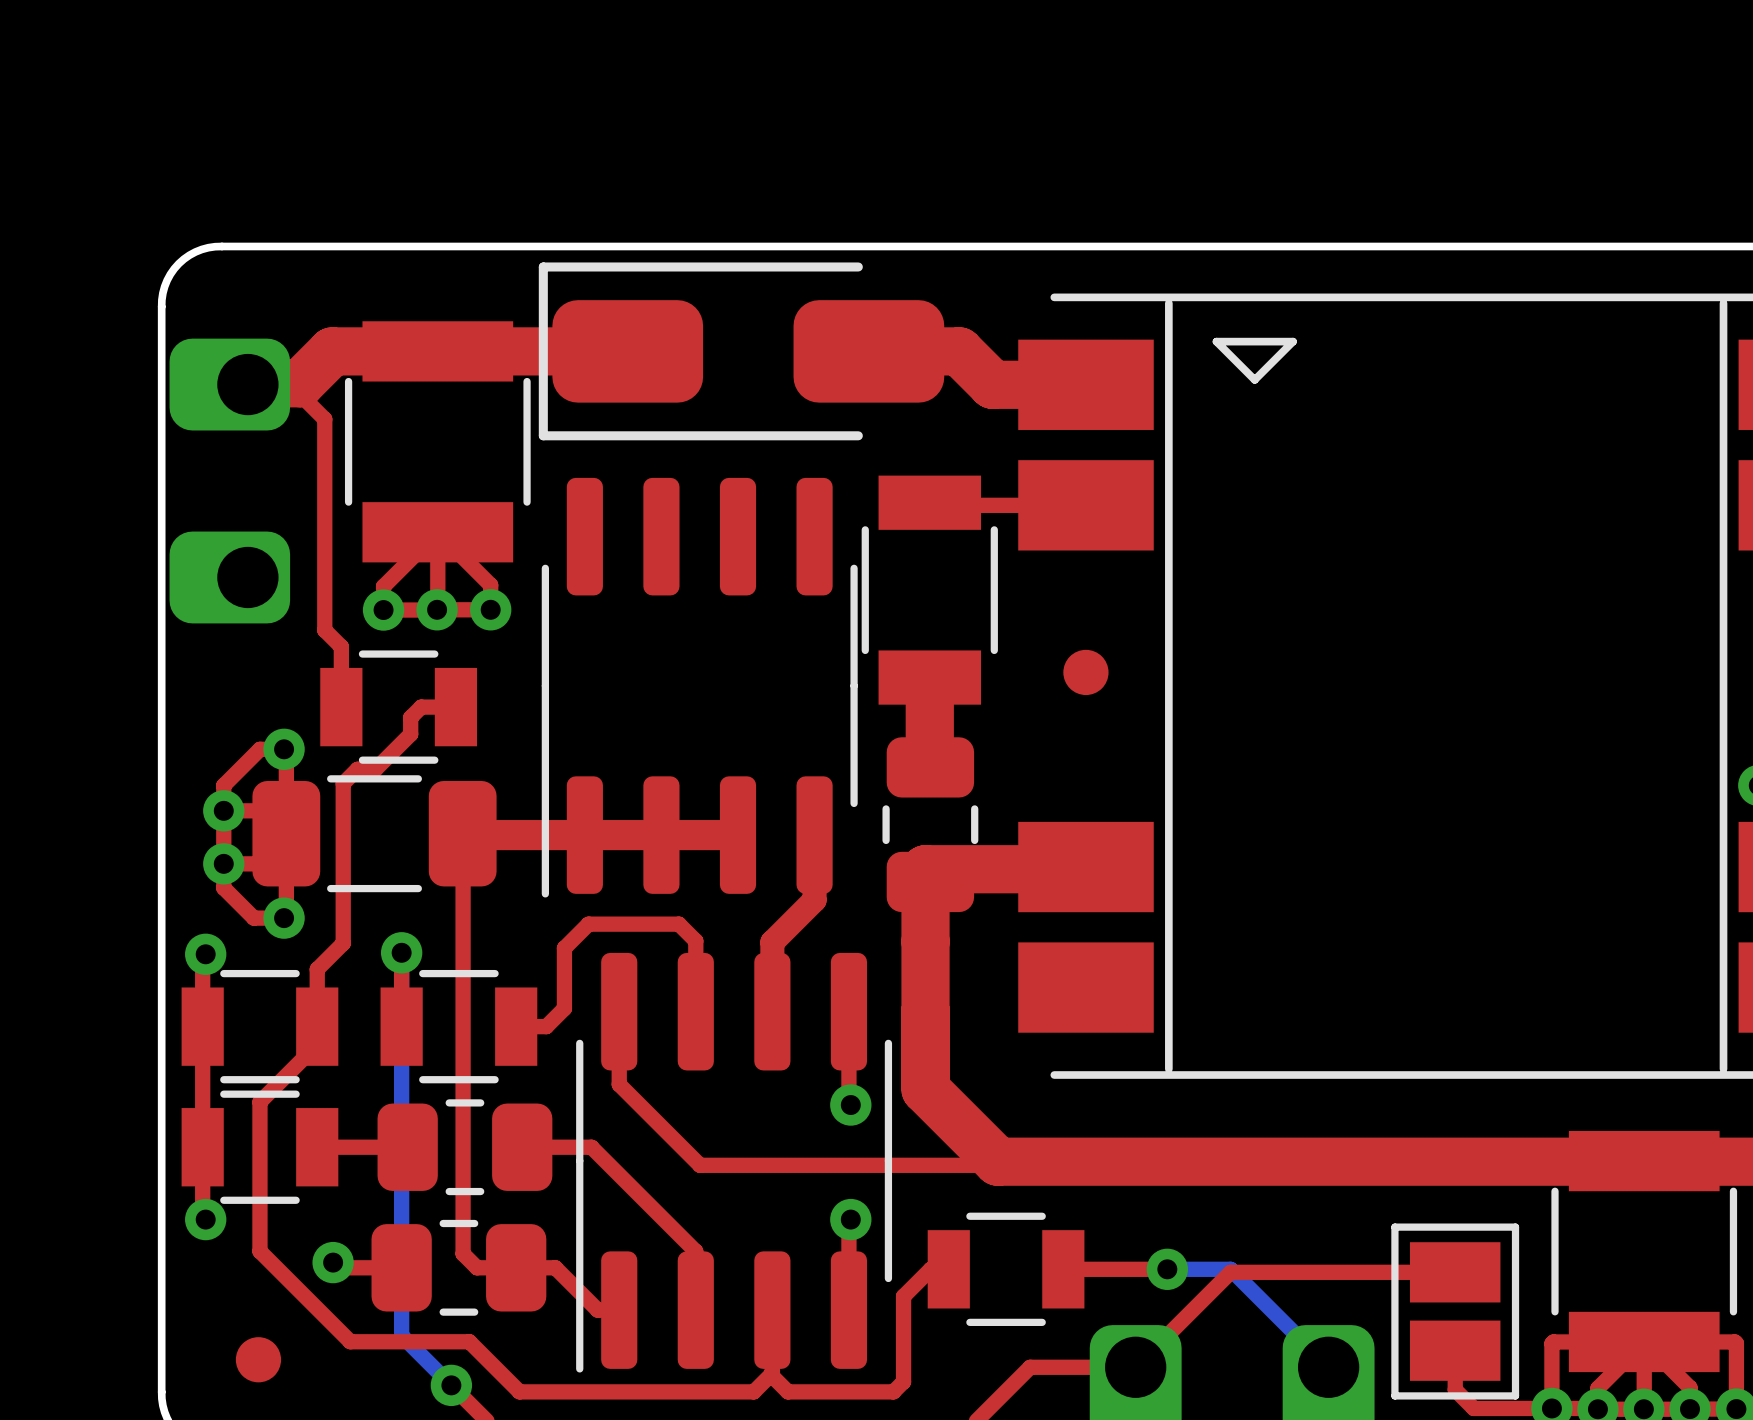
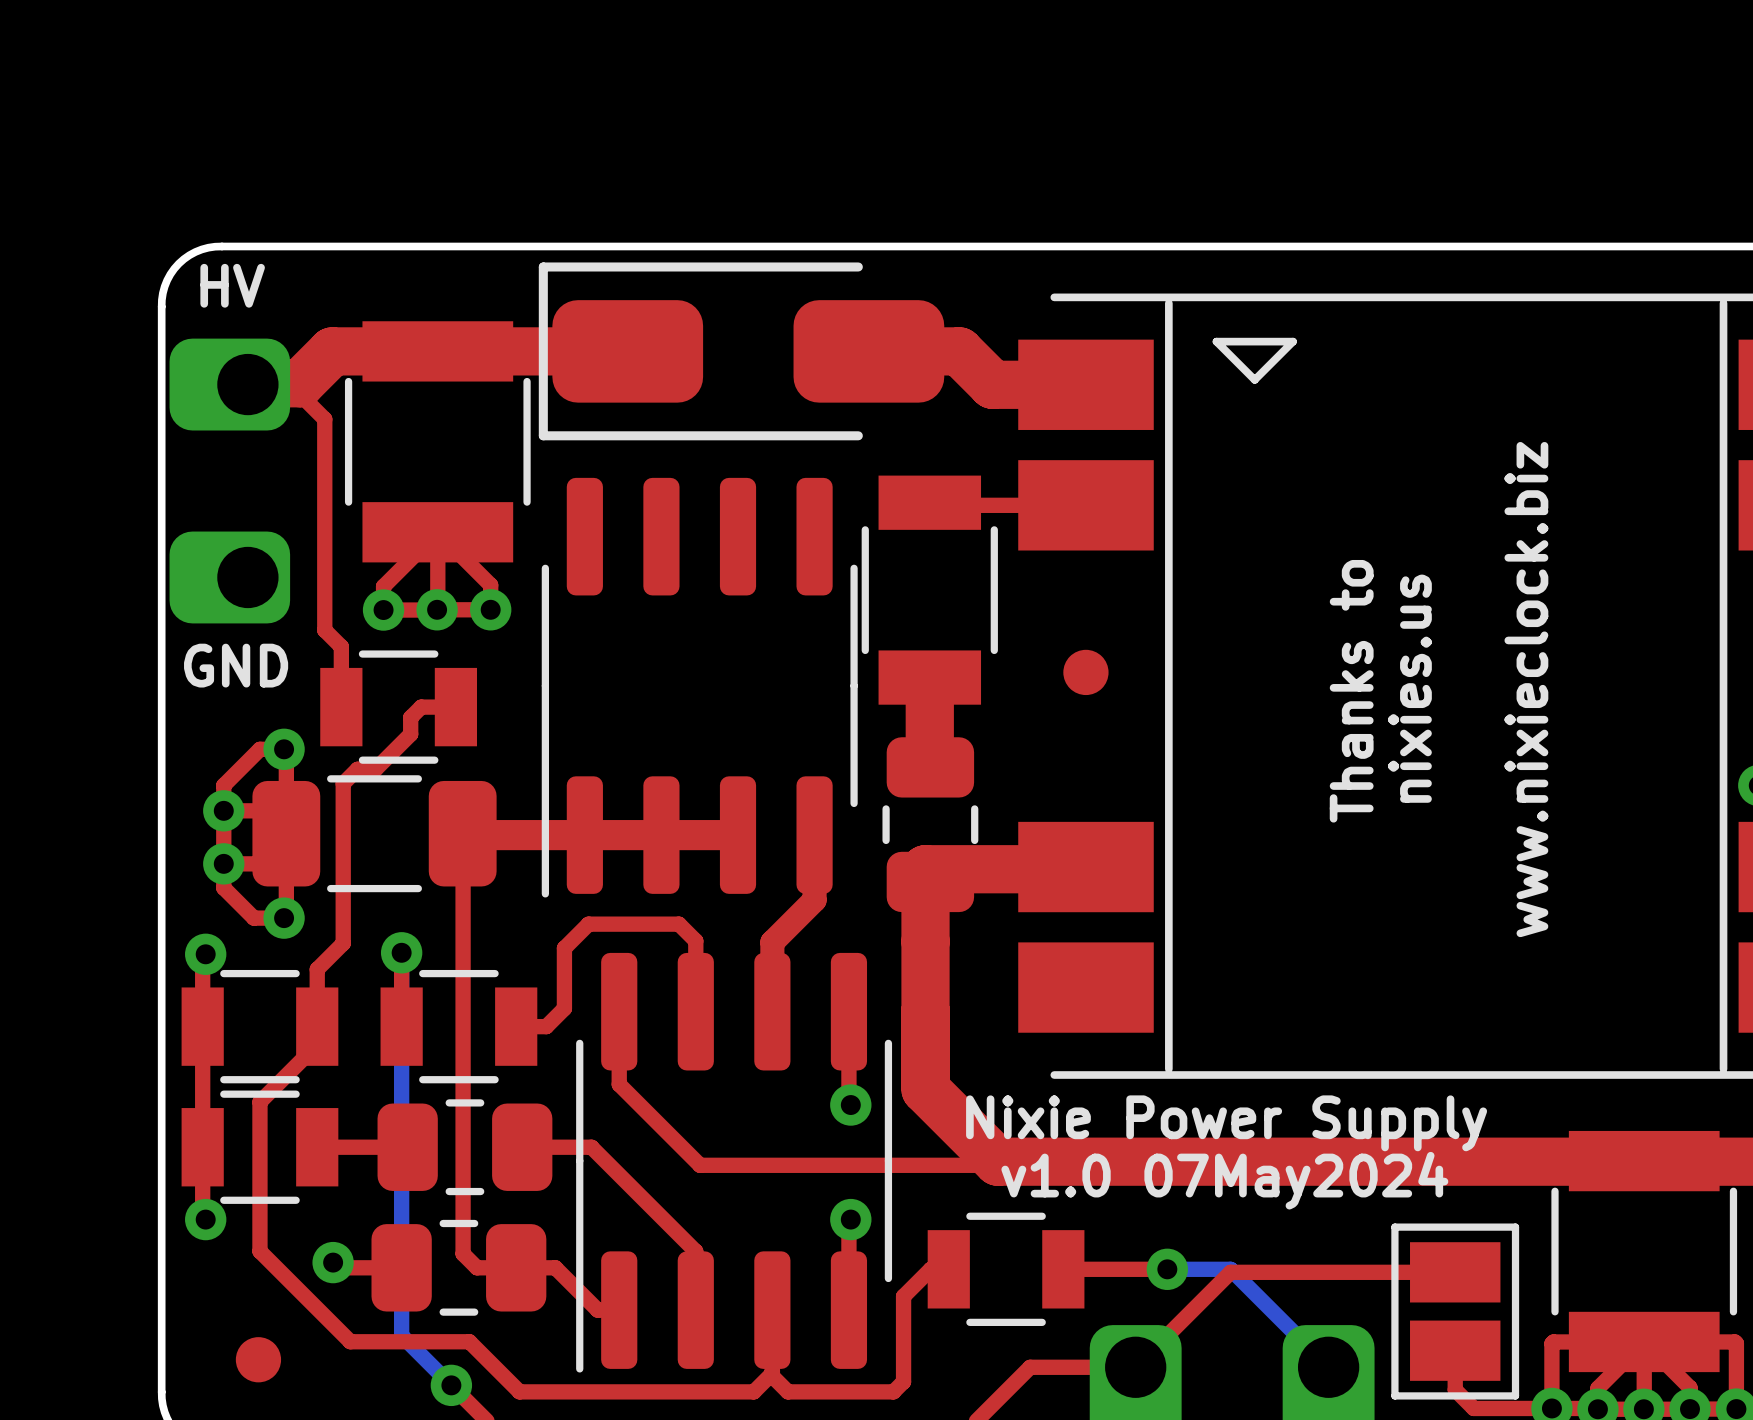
text: none -> HV (232, 285)
text: none -> GND (236, 665)
text: none -> nixies.us (1409, 688)
text: none -> www.nixieclock.biz (1526, 689)
text: none -> Thanks to (1351, 691)
text: none -> Nixie Power Supply (1226, 1123)
text: none -> v1.0 07May2024 (1224, 1180)

